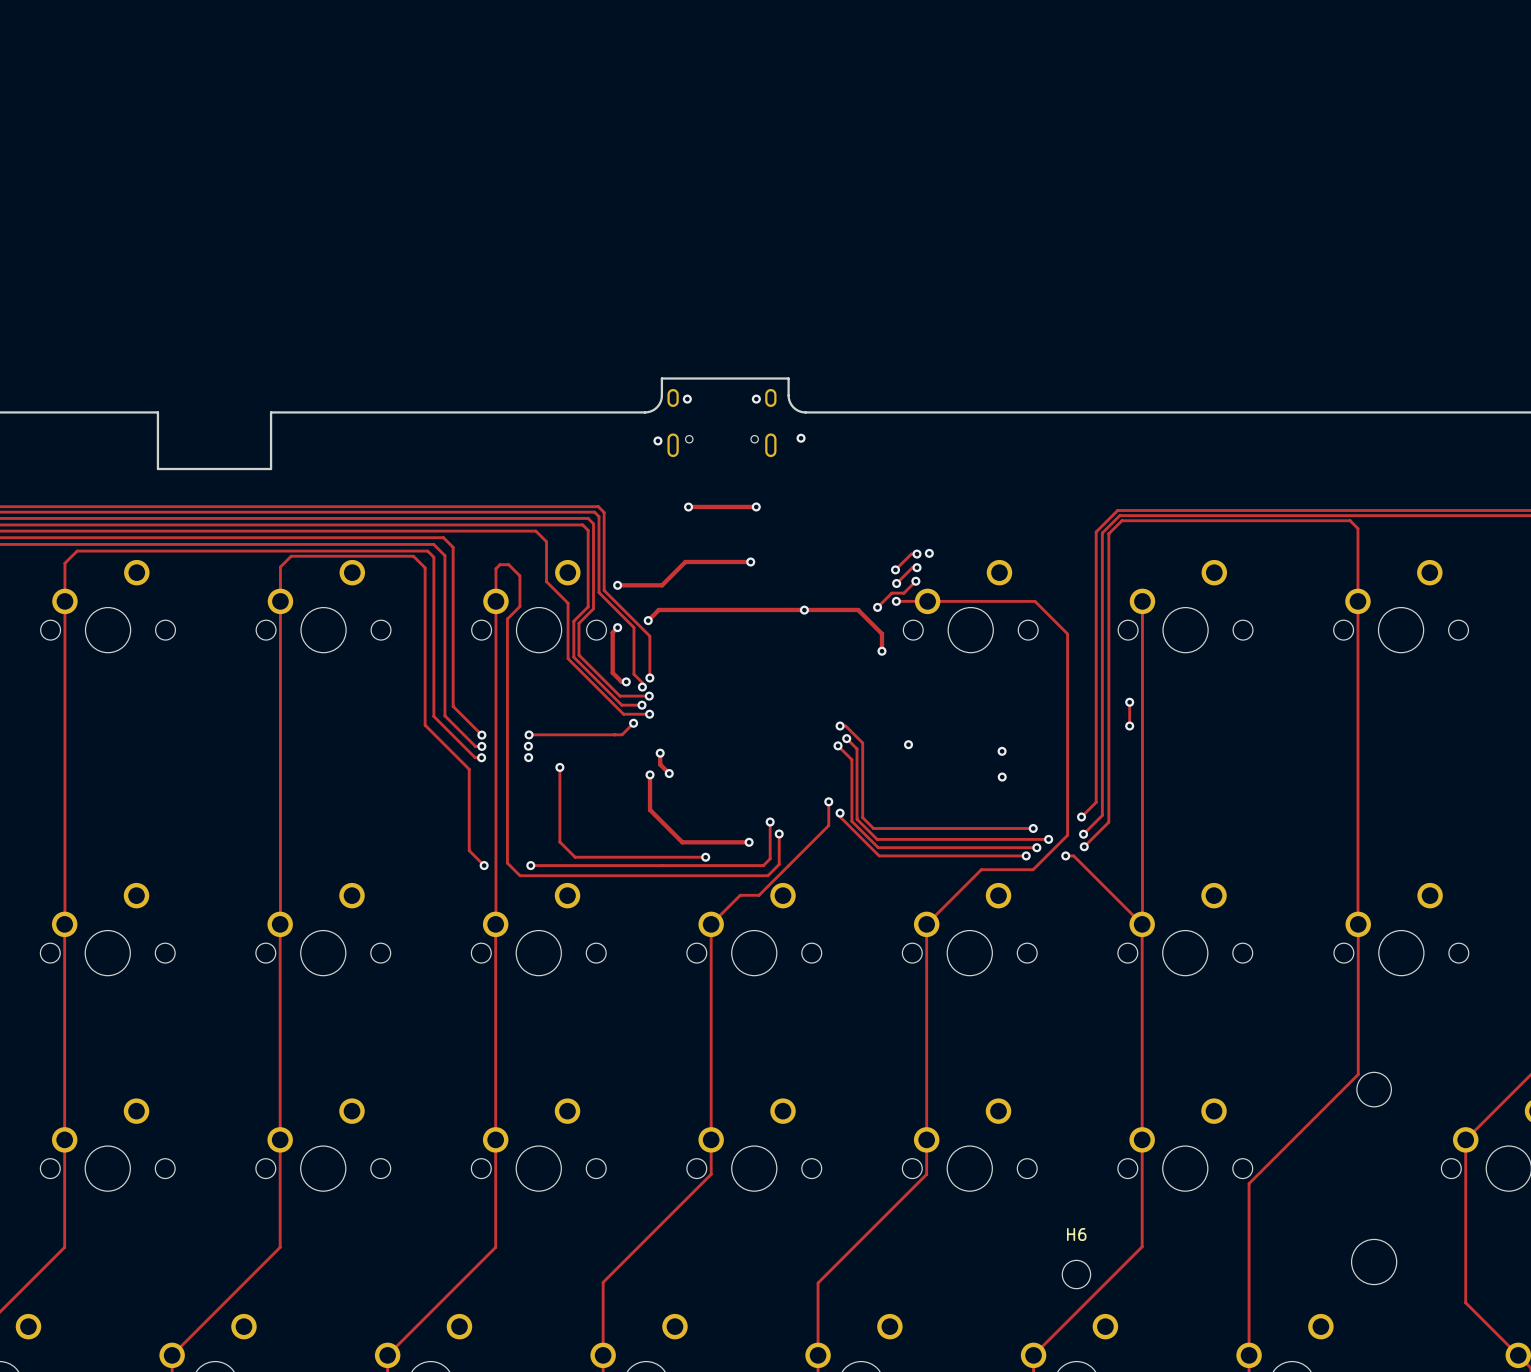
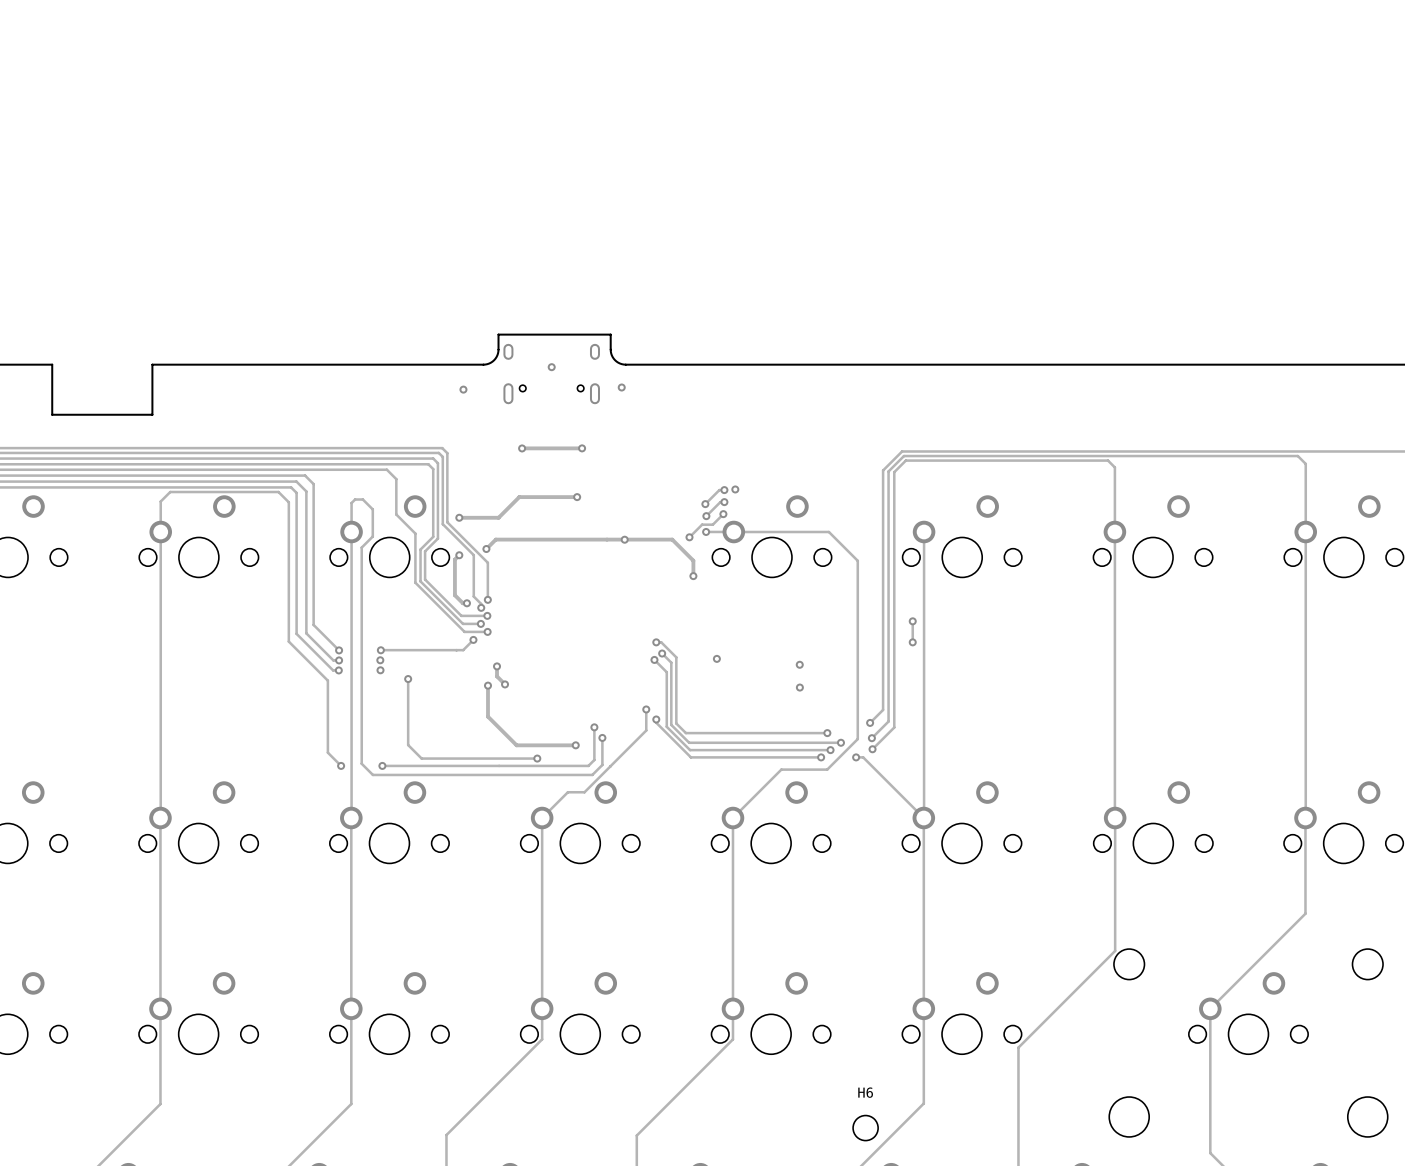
via: (687, 399) -> none
via: (756, 399) -> none
via: none -> (551, 367)
via: none -> (463, 389)
via: (657, 440) -> none

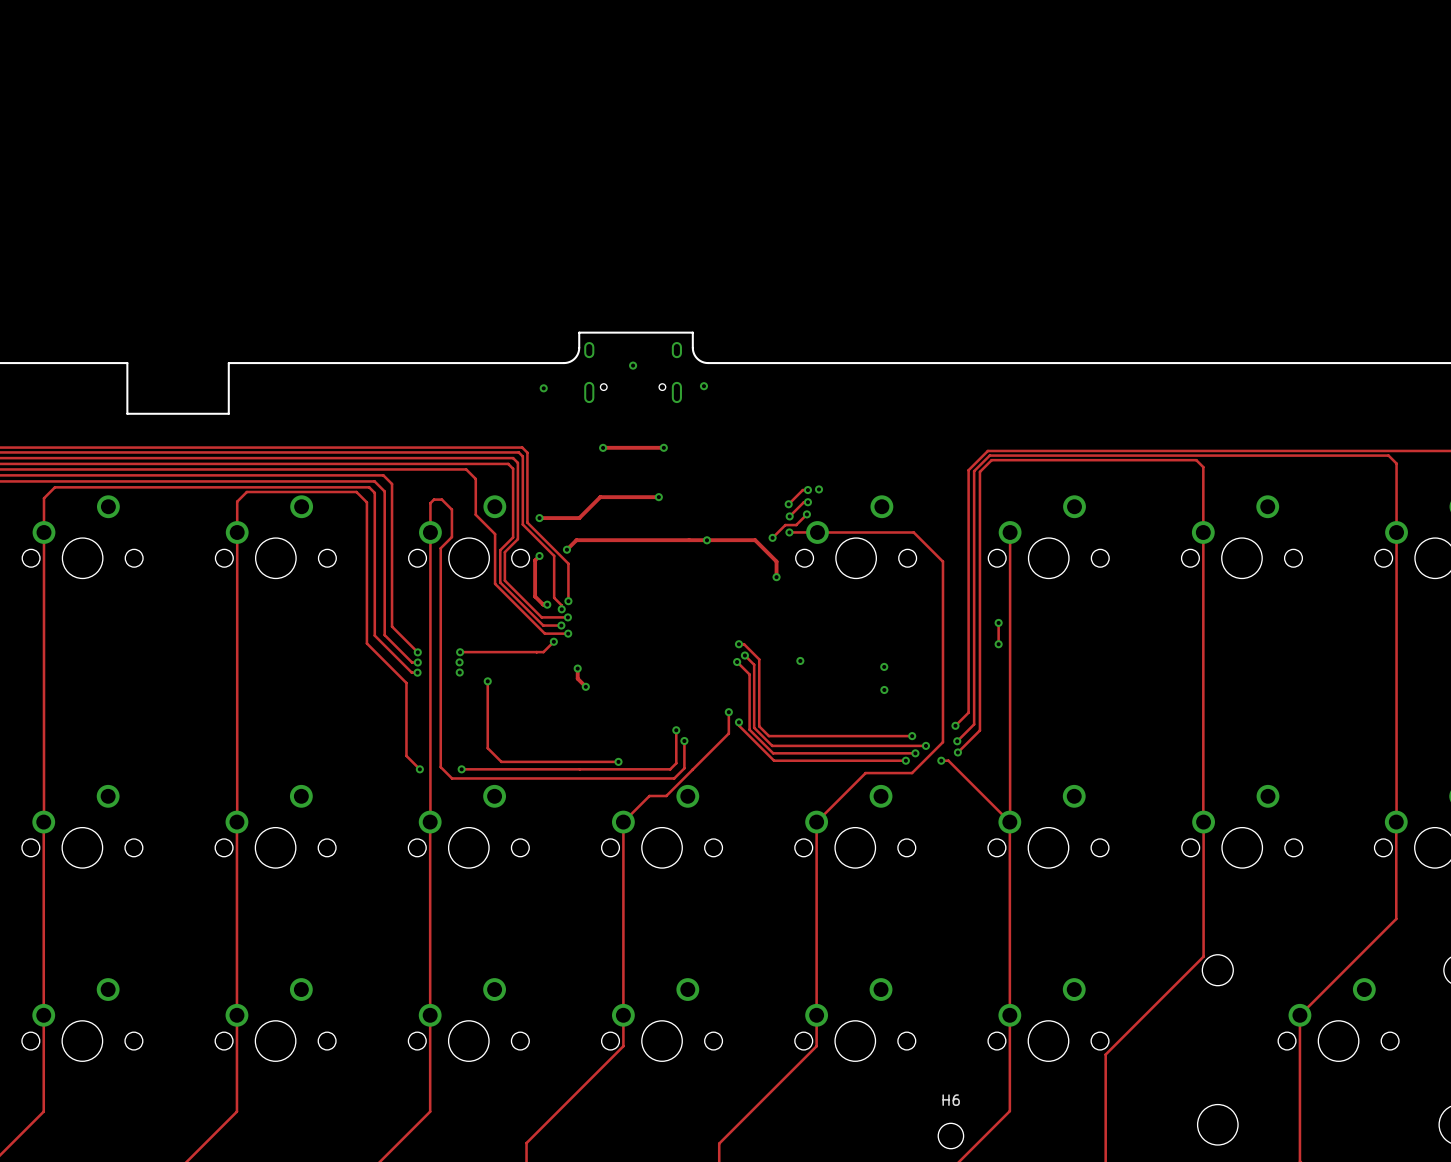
track: (487, 685) (487, 716) (516, 745) (575, 745) -> none
via: (487, 685) -> none
via: (575, 745) -> none

